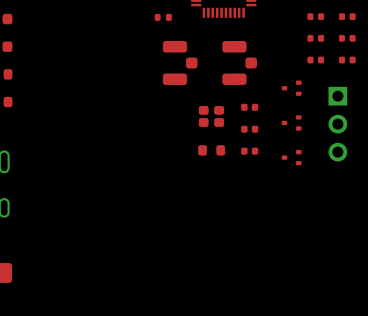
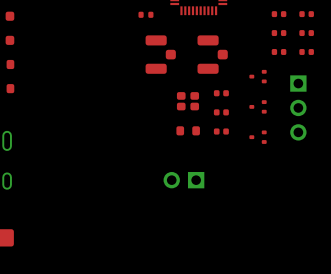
part: none -> (183, 180)

